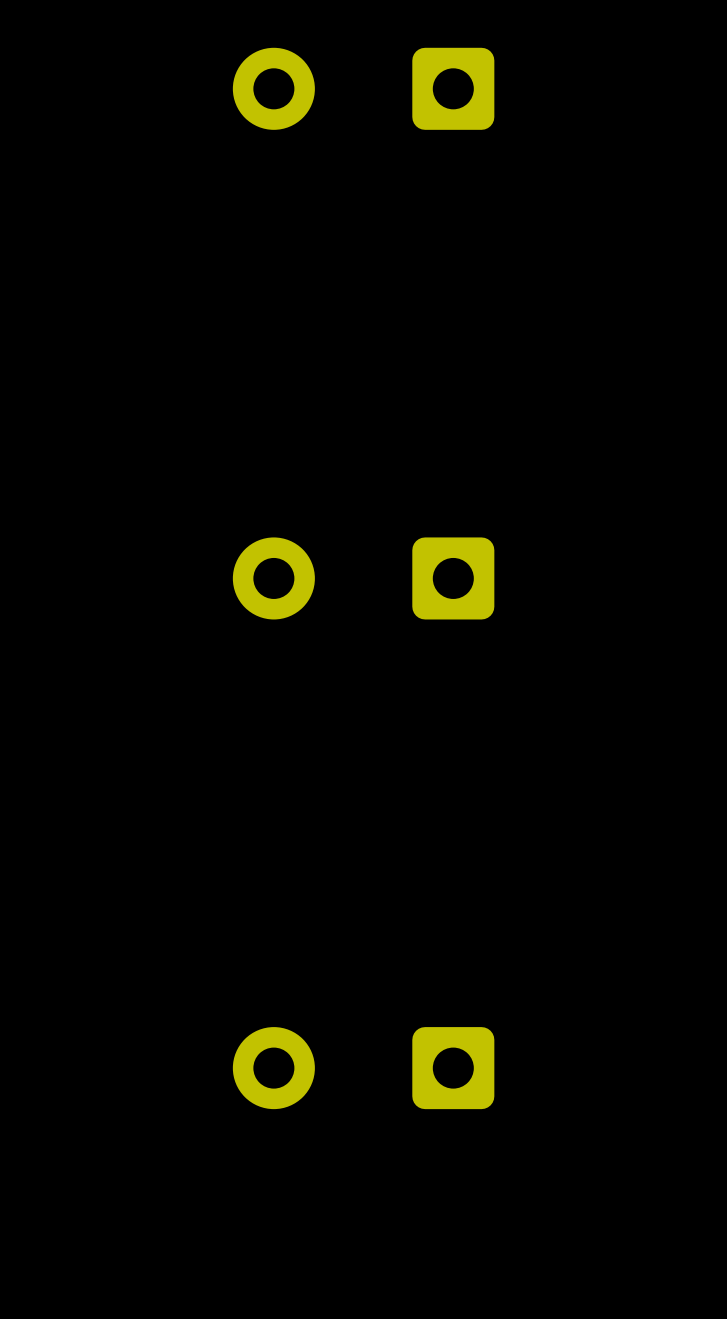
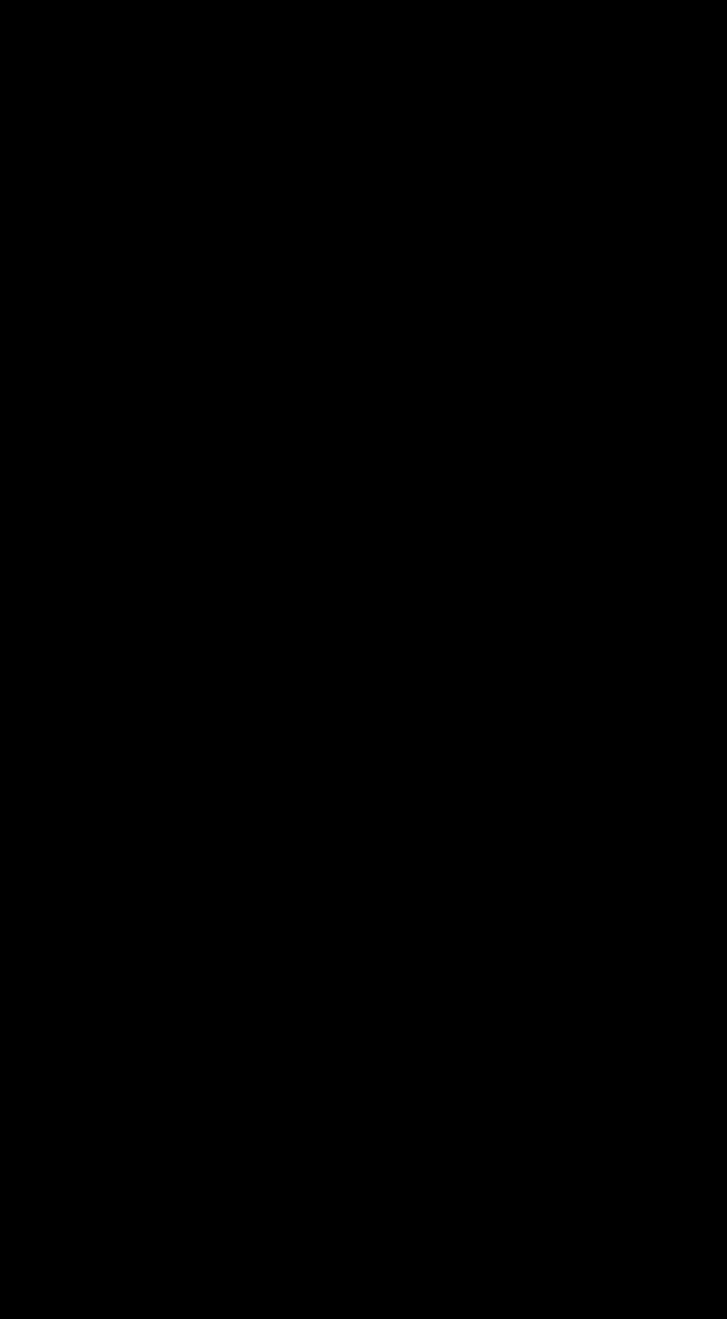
part: (363, 88) -> none
part: (363, 578) -> none
part: (363, 1068) -> none

